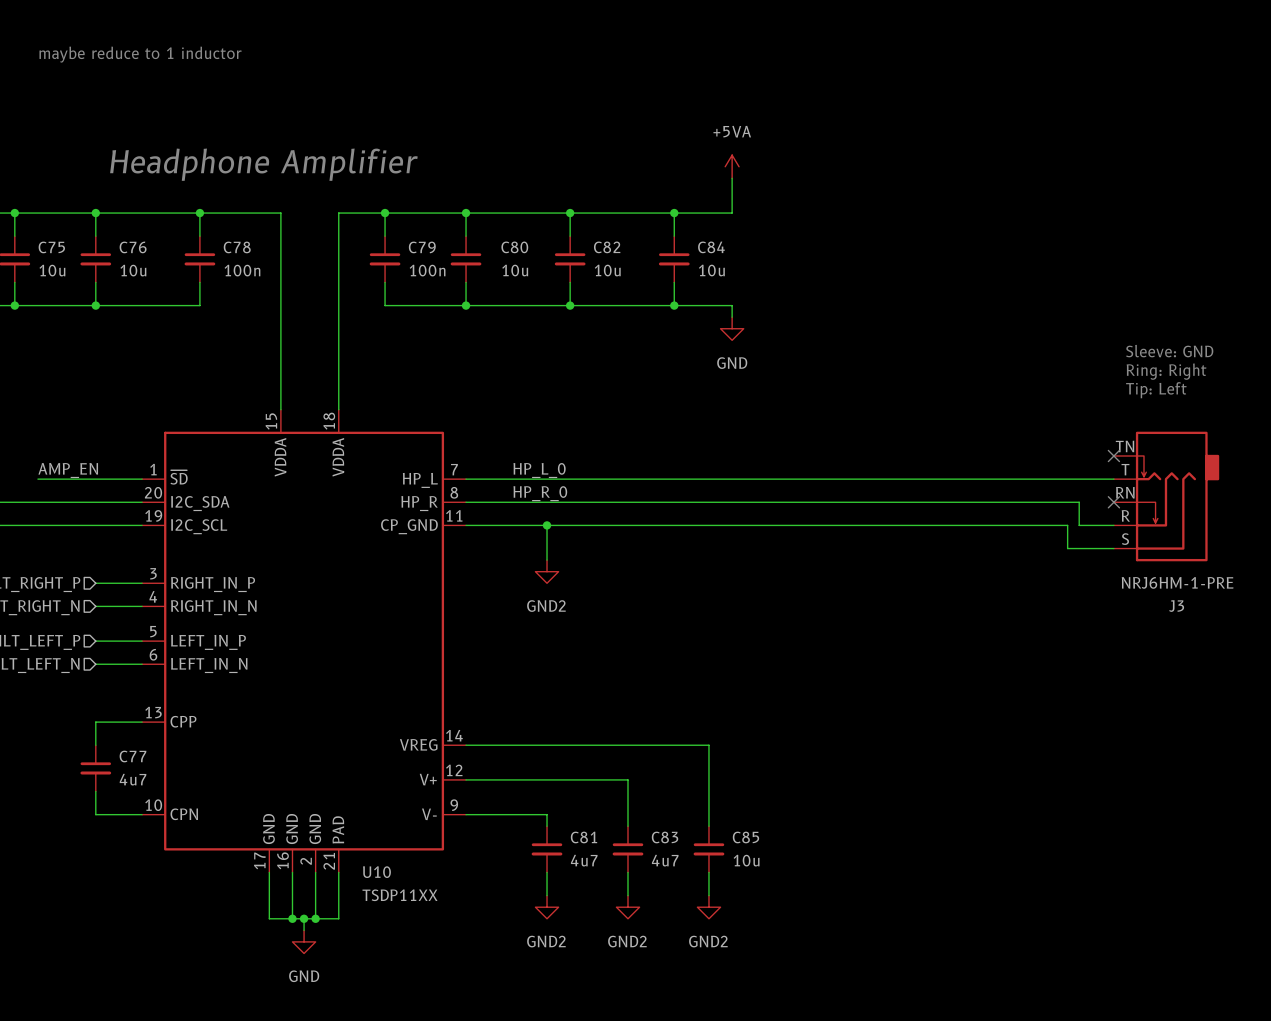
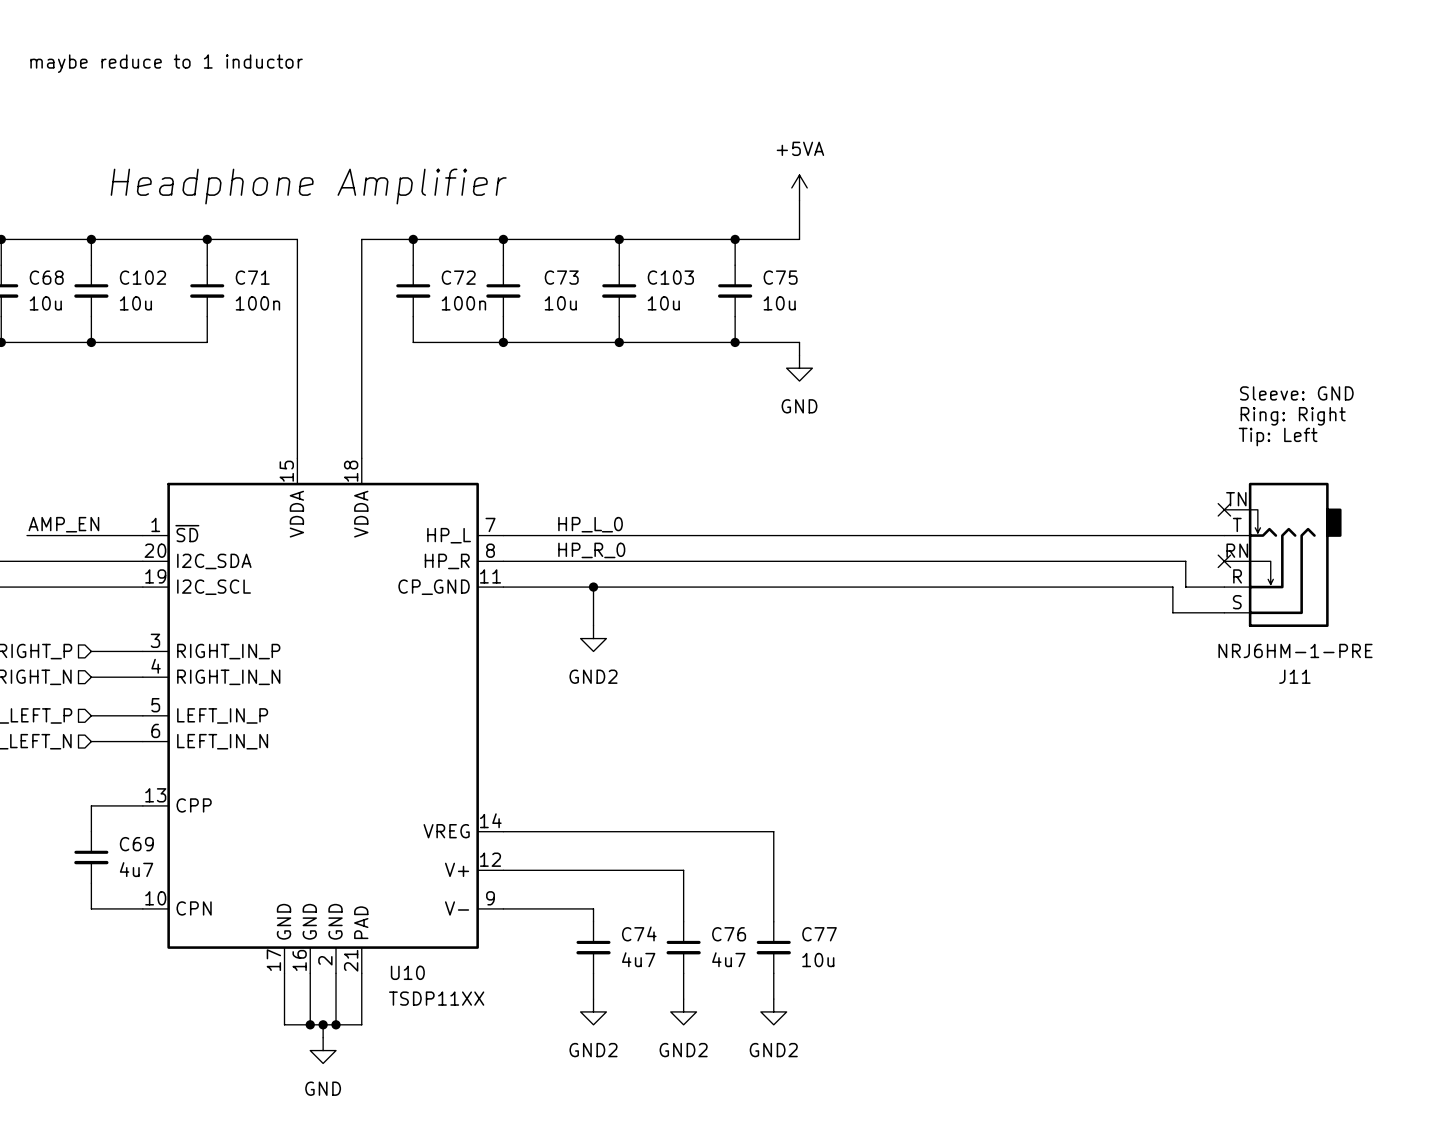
C75 name: C75 (51, 247) -> C68 (46, 277)
C76 name: C76 (133, 247) -> C102 (142, 277)
C78 name: C78 (237, 247) -> C71 (252, 277)
C79 name: C79 (422, 247) -> C72 (458, 277)
C80 name: C80 (514, 247) -> C73 (561, 277)
C82 name: C82 (607, 247) -> C103 (670, 277)
C84 name: C84 (711, 247) -> C75 (780, 277)
J3 name: J3 (1176, 606) -> J11 (1294, 676)
C77 name: C77 (132, 756) -> C69 (136, 844)
C81 name: C81 (584, 837) -> C74 (639, 933)
C83 name: C83 (665, 837) -> C76 (729, 934)
C85 name: C85 (745, 837) -> C77 (819, 934)

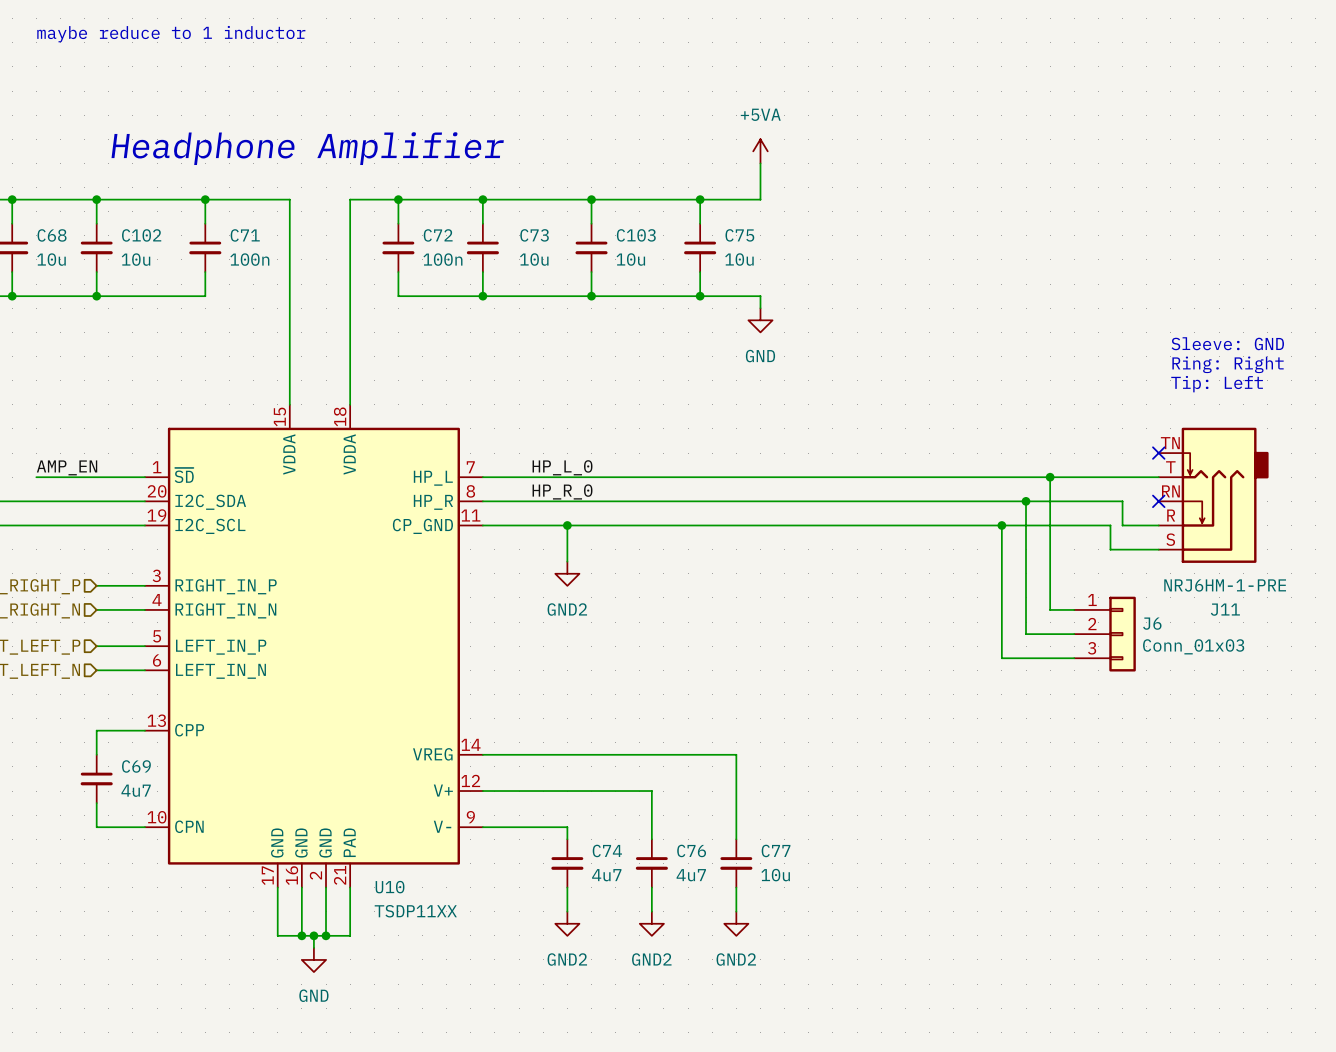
wire: none -> (1050, 477) (1050, 609) (1074, 609)
junction: none -> (1050, 477)
wire: none -> (1026, 501) (1026, 634) (1074, 634)
junction: none -> (1026, 501)
wire: none -> (1001, 525) (1001, 658) (1074, 658)
junction: none -> (1001, 525)
J6: none -> Conn_01x03 (1105, 634)

